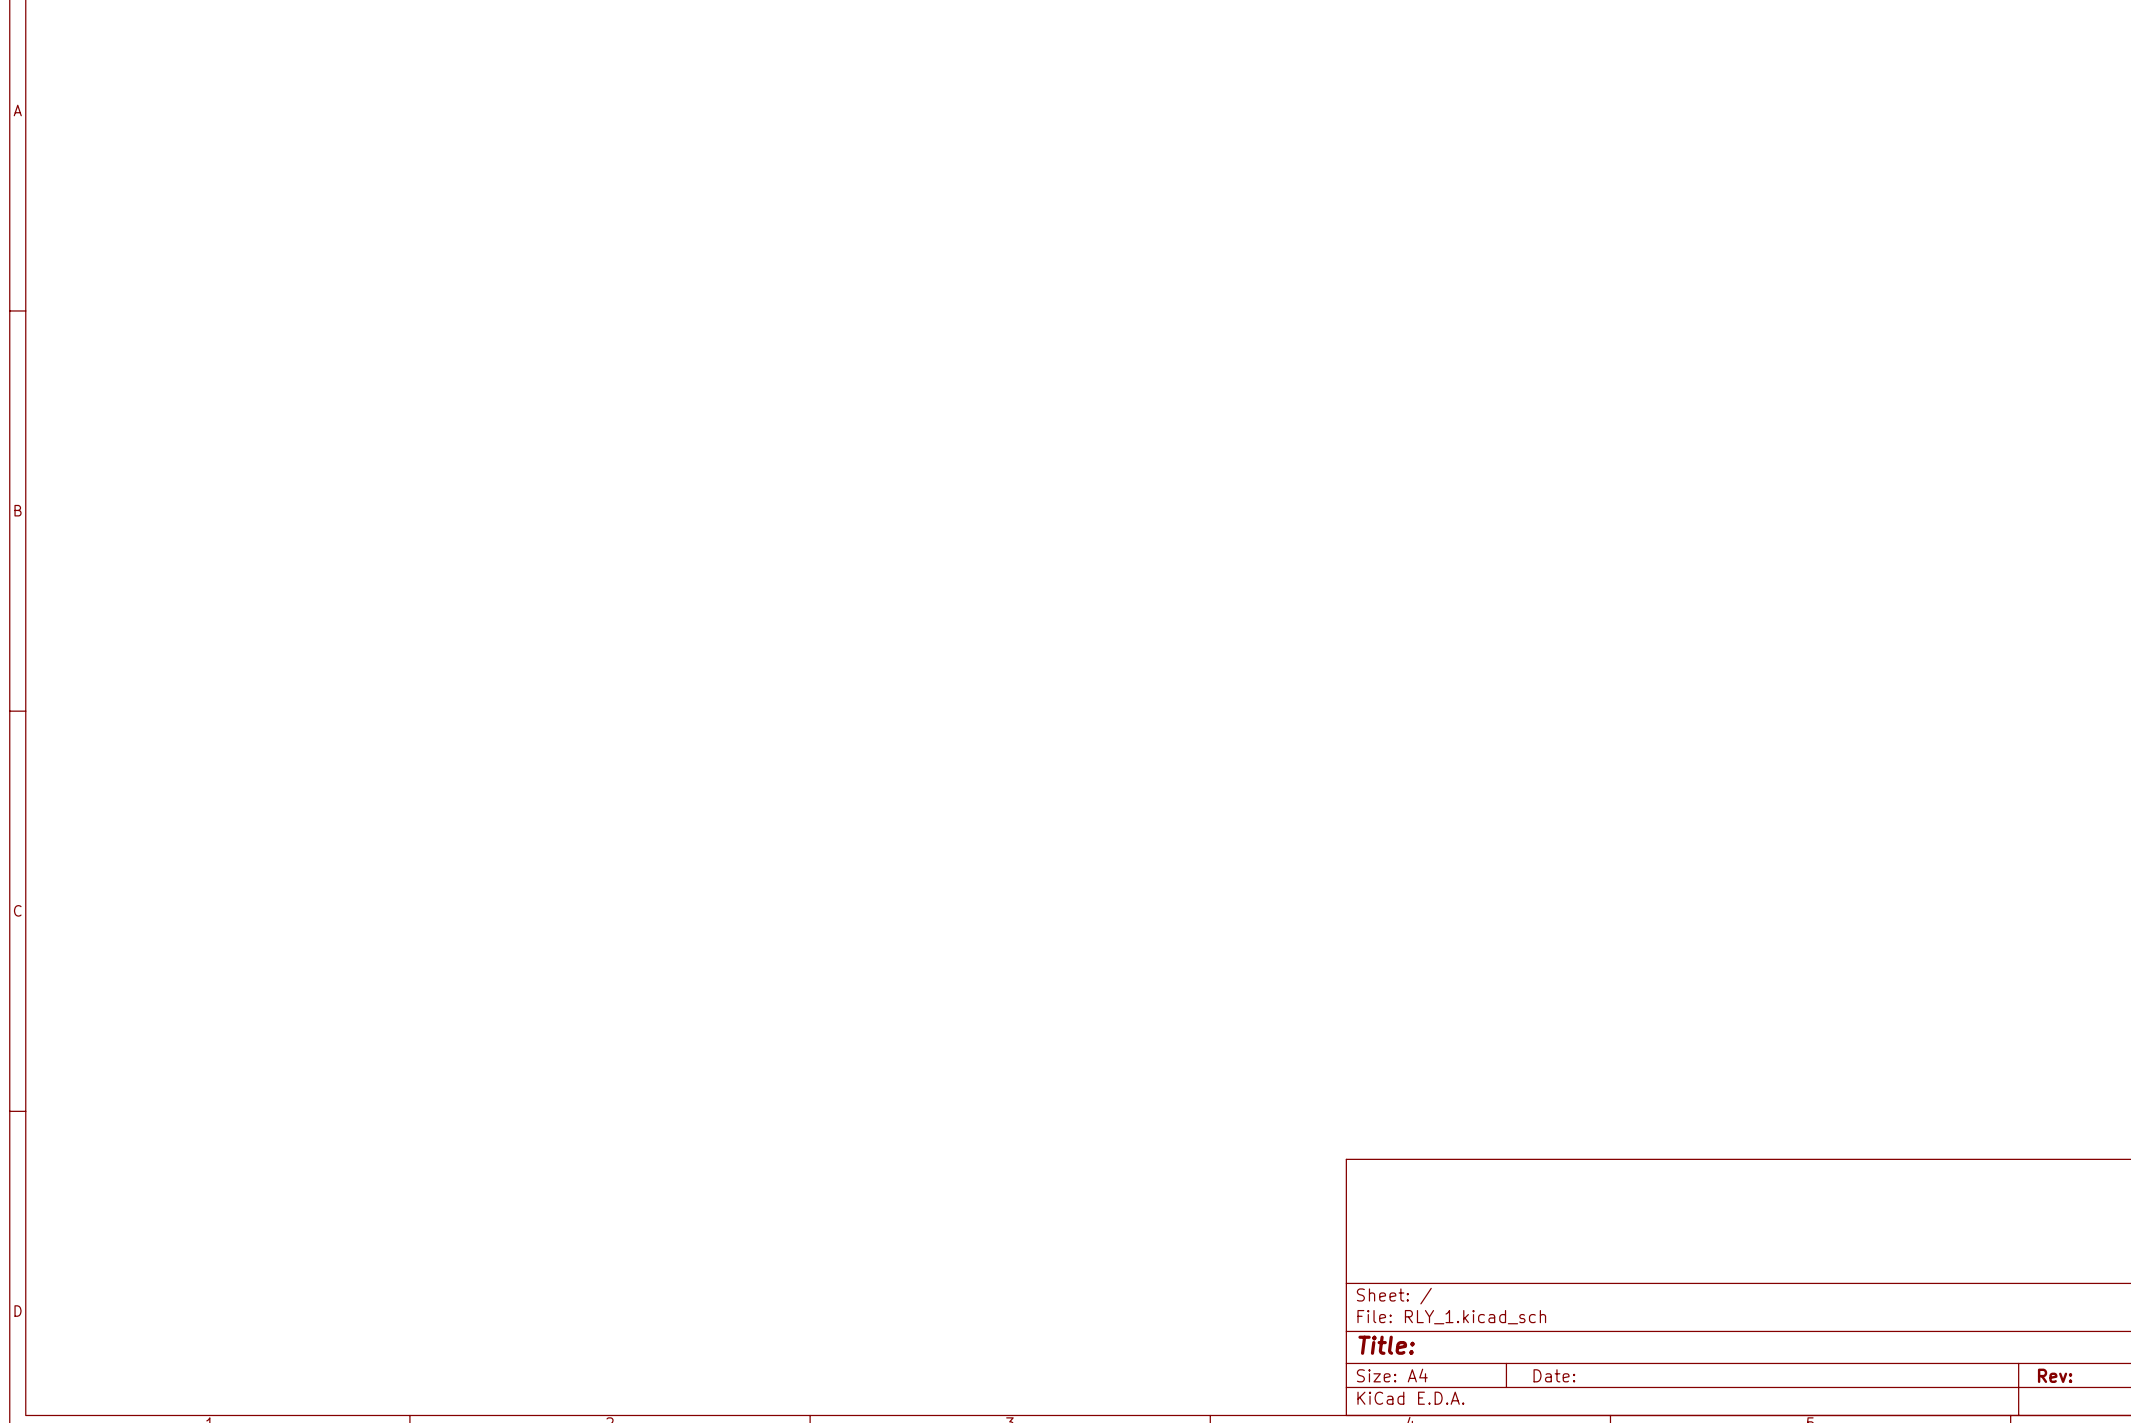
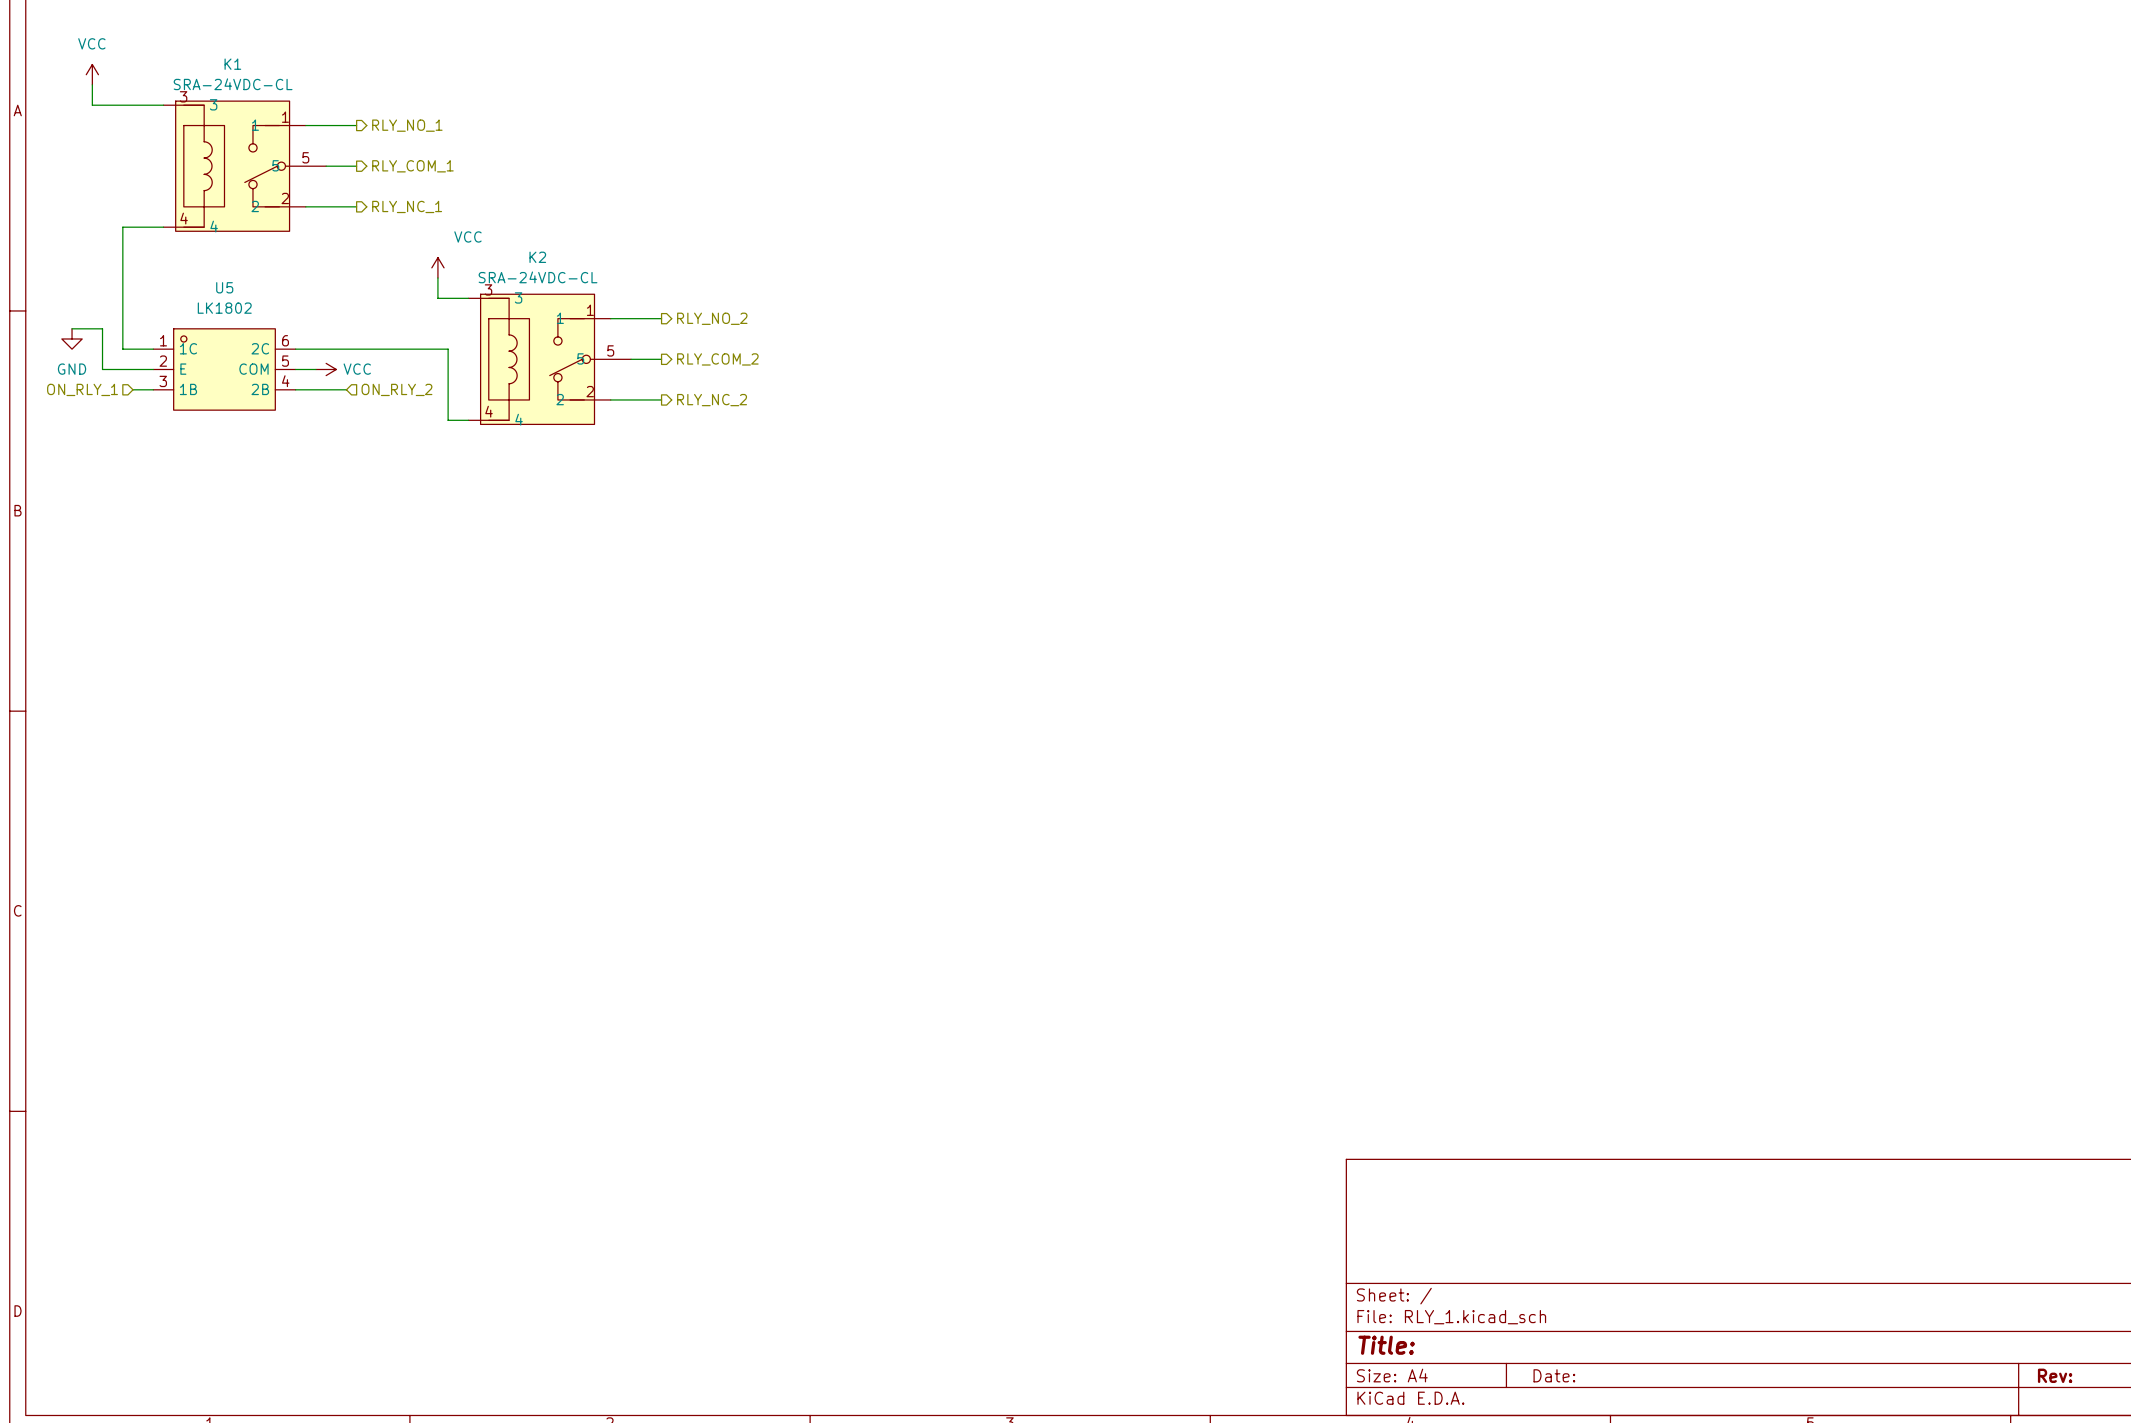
power symbol: none -> VCC (92, 74)
wire: none -> (92, 84) (92, 105) (163, 105)
wire: none -> (305, 125) (356, 125)
hierarchical label: none -> RLY_NO_1 (407, 125)
K1: none -> SRA-24VDC-CL (244, 166)
wire: none -> (326, 166) (356, 166)
hierarchical label: none -> RLY_COM_1 (412, 166)
wire: none -> (305, 206) (356, 206)
hierarchical label: none -> RLY_NC_1 (407, 206)
wire: none -> (163, 227) (122, 227) (122, 349) (153, 349)
power symbol: none -> VCC (437, 267)
wire: none -> (437, 278) (437, 298) (468, 298)
wire: none -> (610, 318) (661, 318)
hierarchical label: none -> RLY_NO_2 (712, 318)
wire: none -> (72, 328) (102, 328) (102, 369) (153, 369)
power symbol: none -> GND (72, 338)
wire: none -> (295, 349) (448, 349) (448, 420) (468, 420)
K2: none -> SRA-24VDC-CL (549, 359)
wire: none -> (631, 359) (661, 359)
hierarchical label: none -> RLY_COM_2 (717, 359)
U5: none -> LK1802 (224, 369)
wire: none -> (295, 369) (315, 369)
power symbol: none -> VCC (326, 369)
hierarchical label: none -> ON_RLY_1 (82, 389)
wire: none -> (133, 389) (153, 389)
wire: none -> (295, 389) (346, 389)
hierarchical label: none -> ON_RLY_2 (396, 389)
wire: none -> (610, 399) (661, 399)
hierarchical label: none -> RLY_NC_2 (712, 400)

